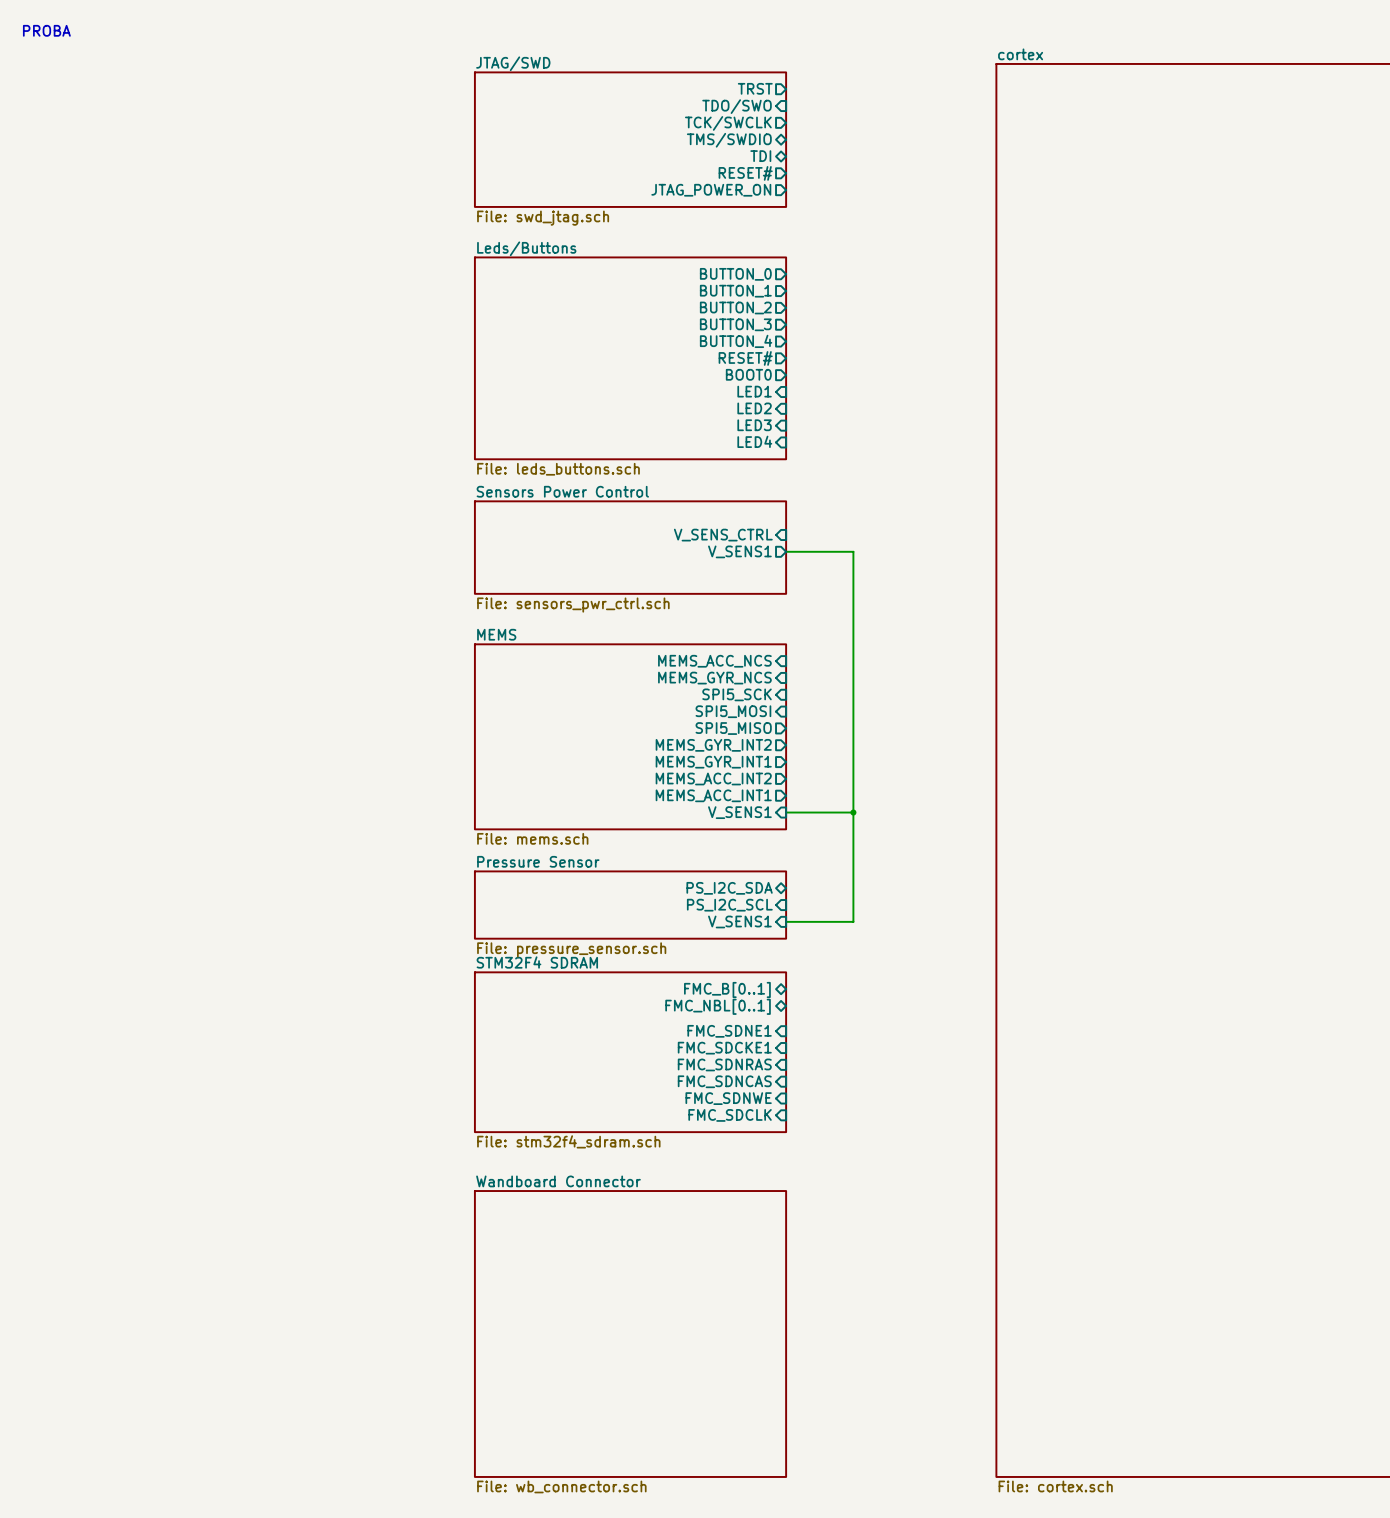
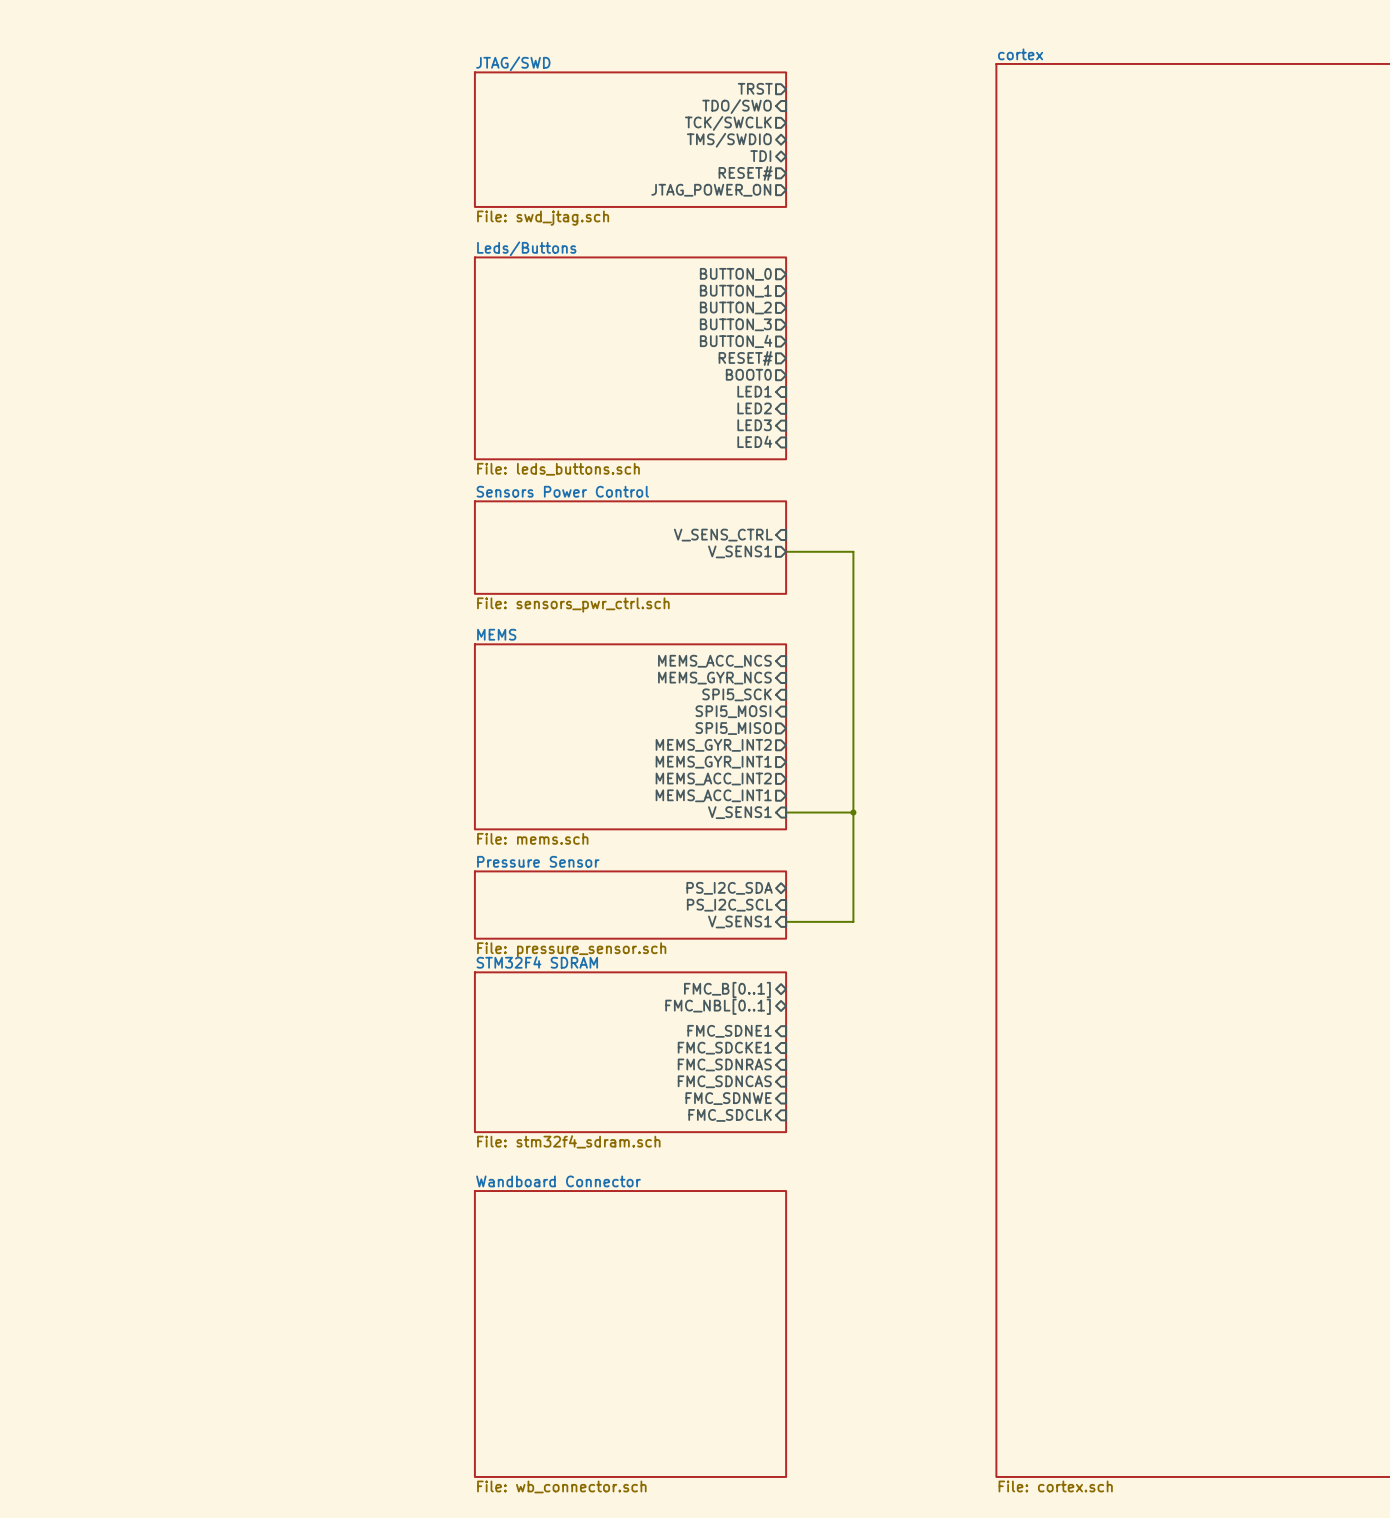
text: PROBA (46, 30) -> none

